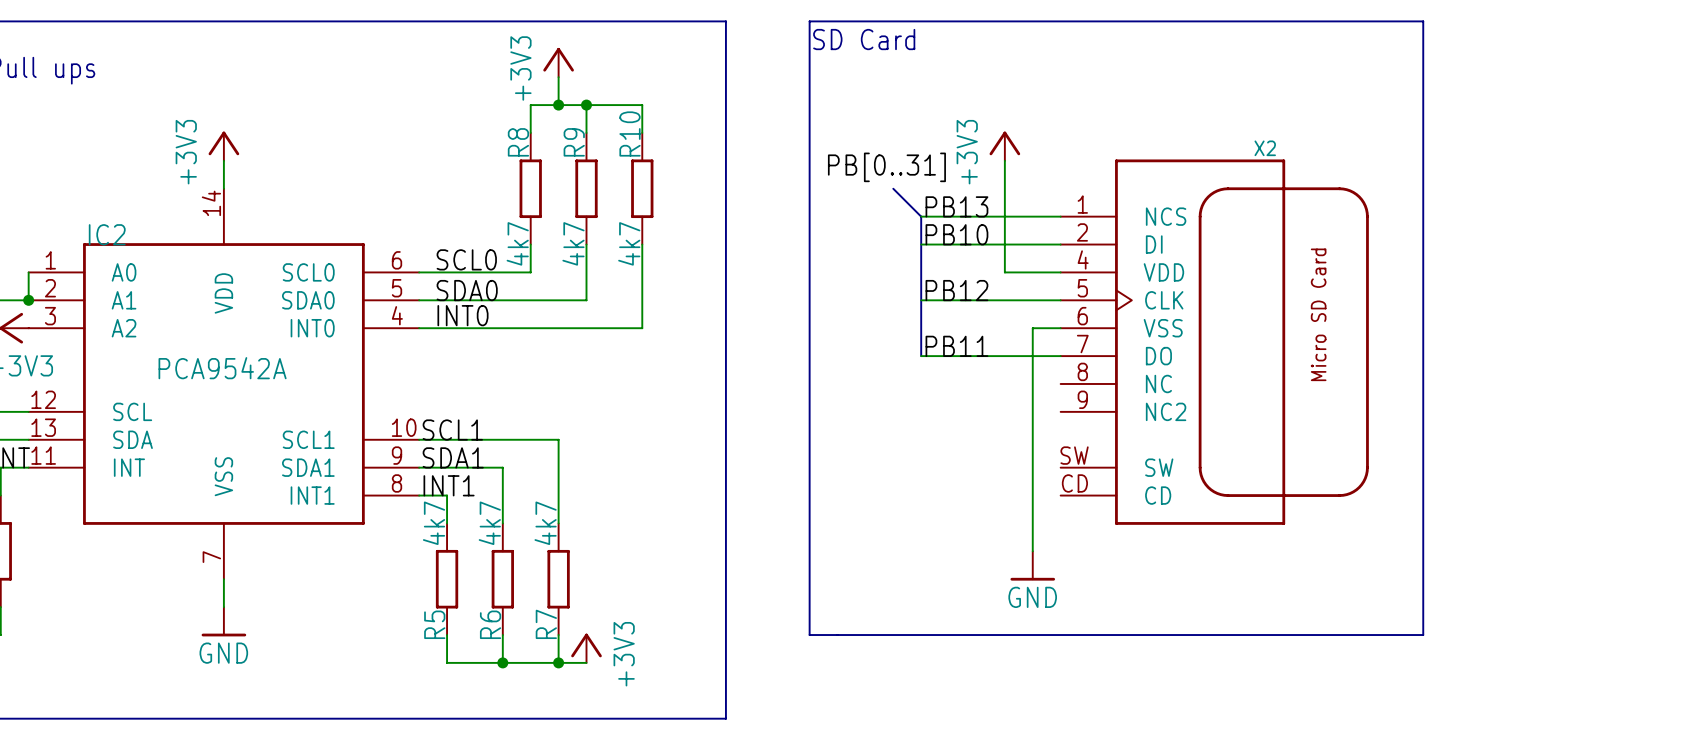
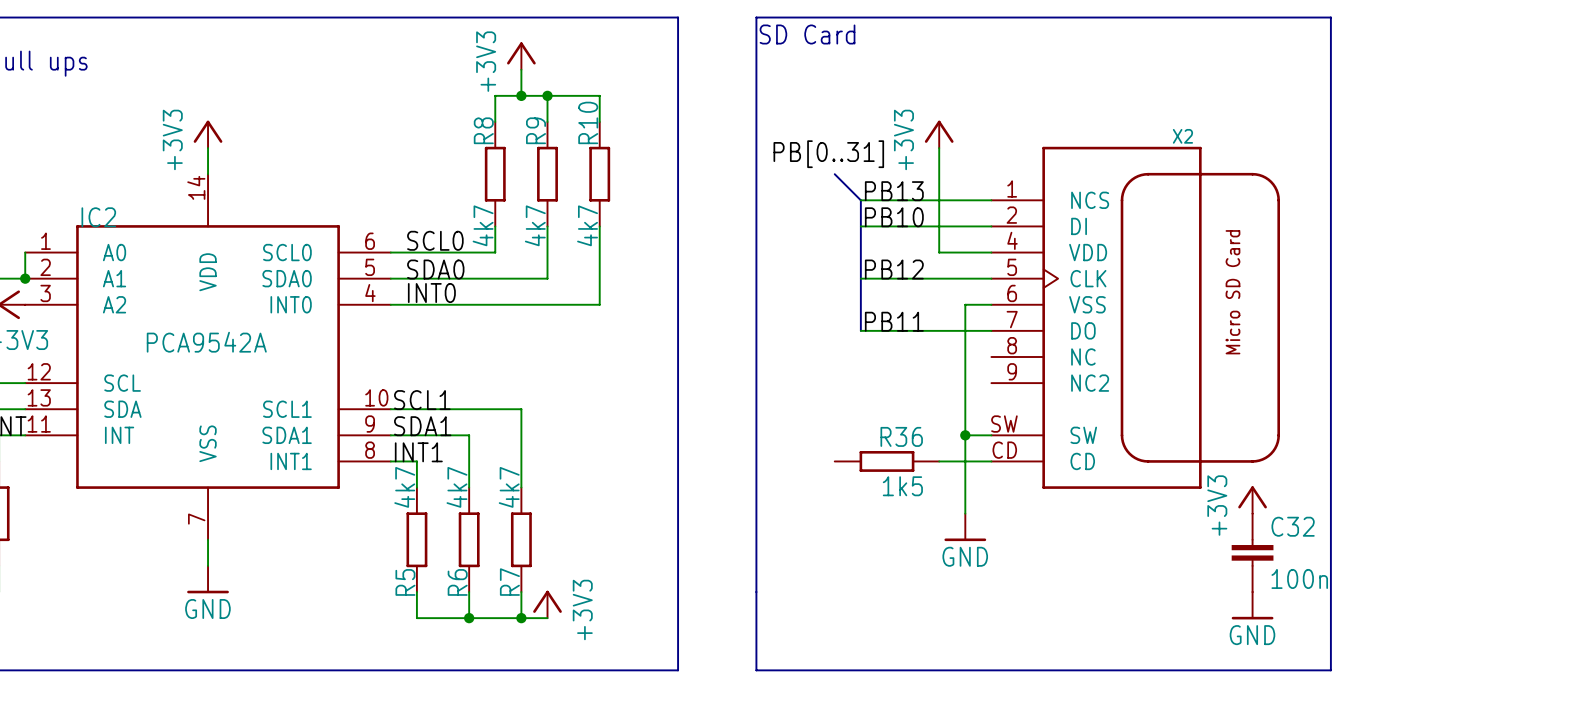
wire: none -> (965, 435) (991, 435)
junction: none -> (965, 435)
R36: none -> 1k5 (886, 461)
wire: none -> (939, 461) (991, 461)
power symbol: none -> +3V3 (1252, 499)
C32: none -> 100n (1252, 552)
line: (809, 635) (1423, 635) -> (756, 592) (756, 670) (1330, 670) (1330, 592)
power symbol: none -> GND (1252, 605)

